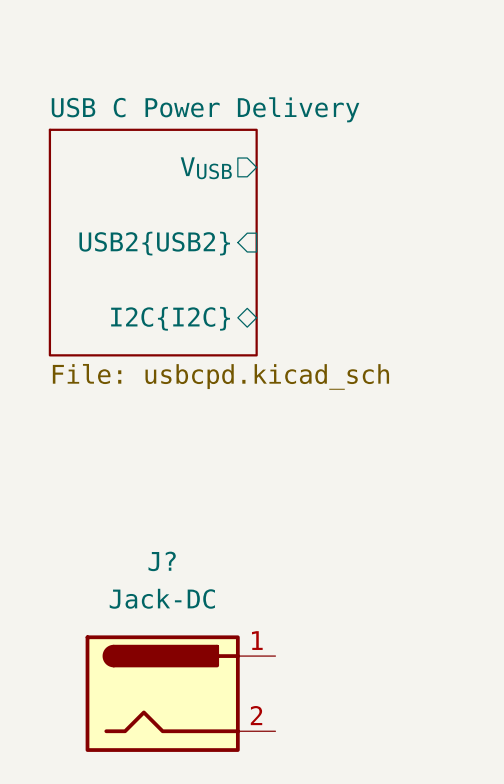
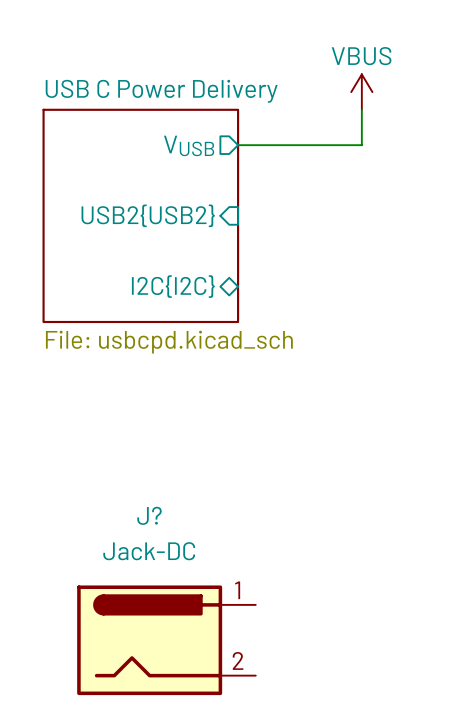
power symbol: none -> VBUS (361, 92)
wire: none -> (361, 109) (361, 145) (238, 145)

